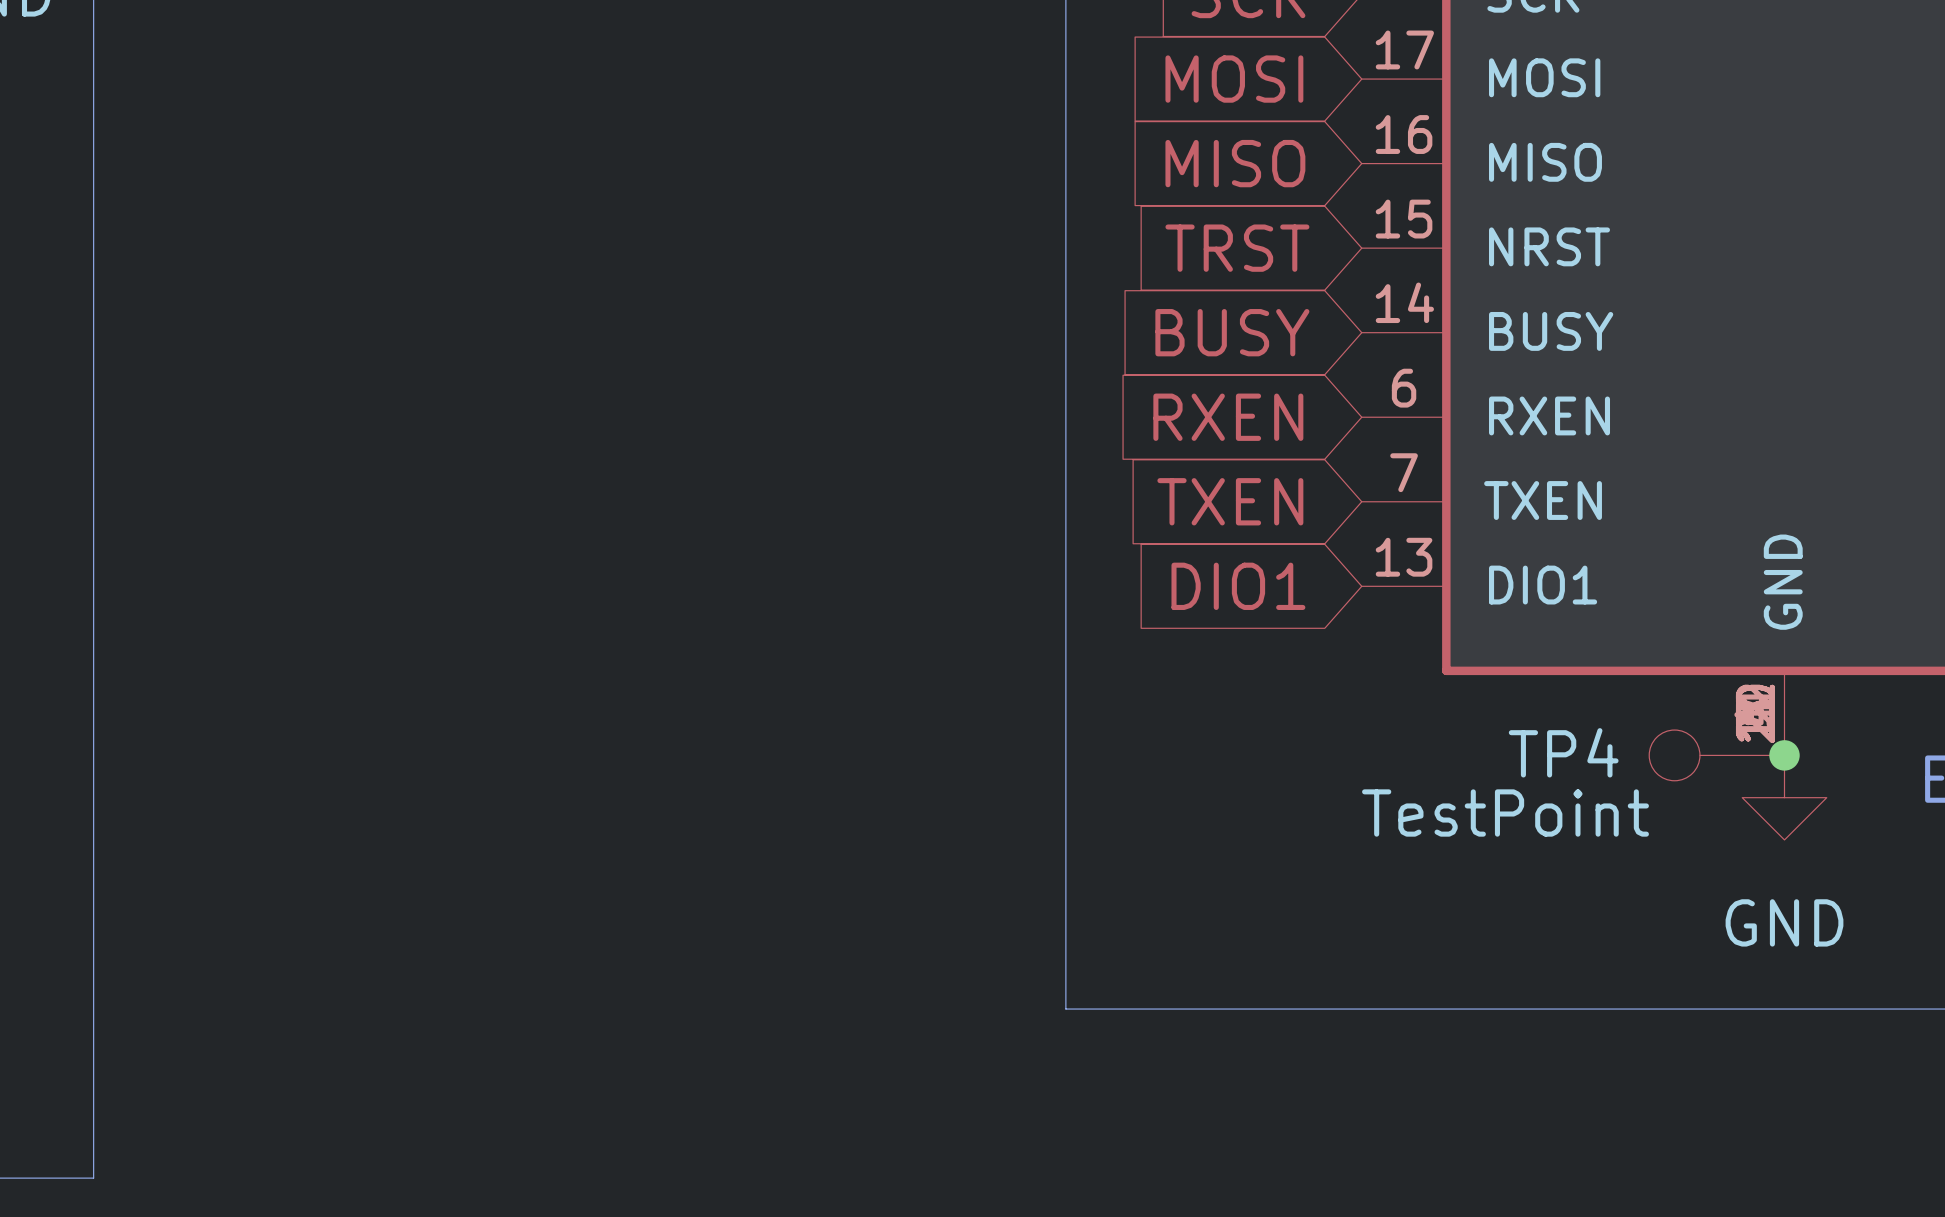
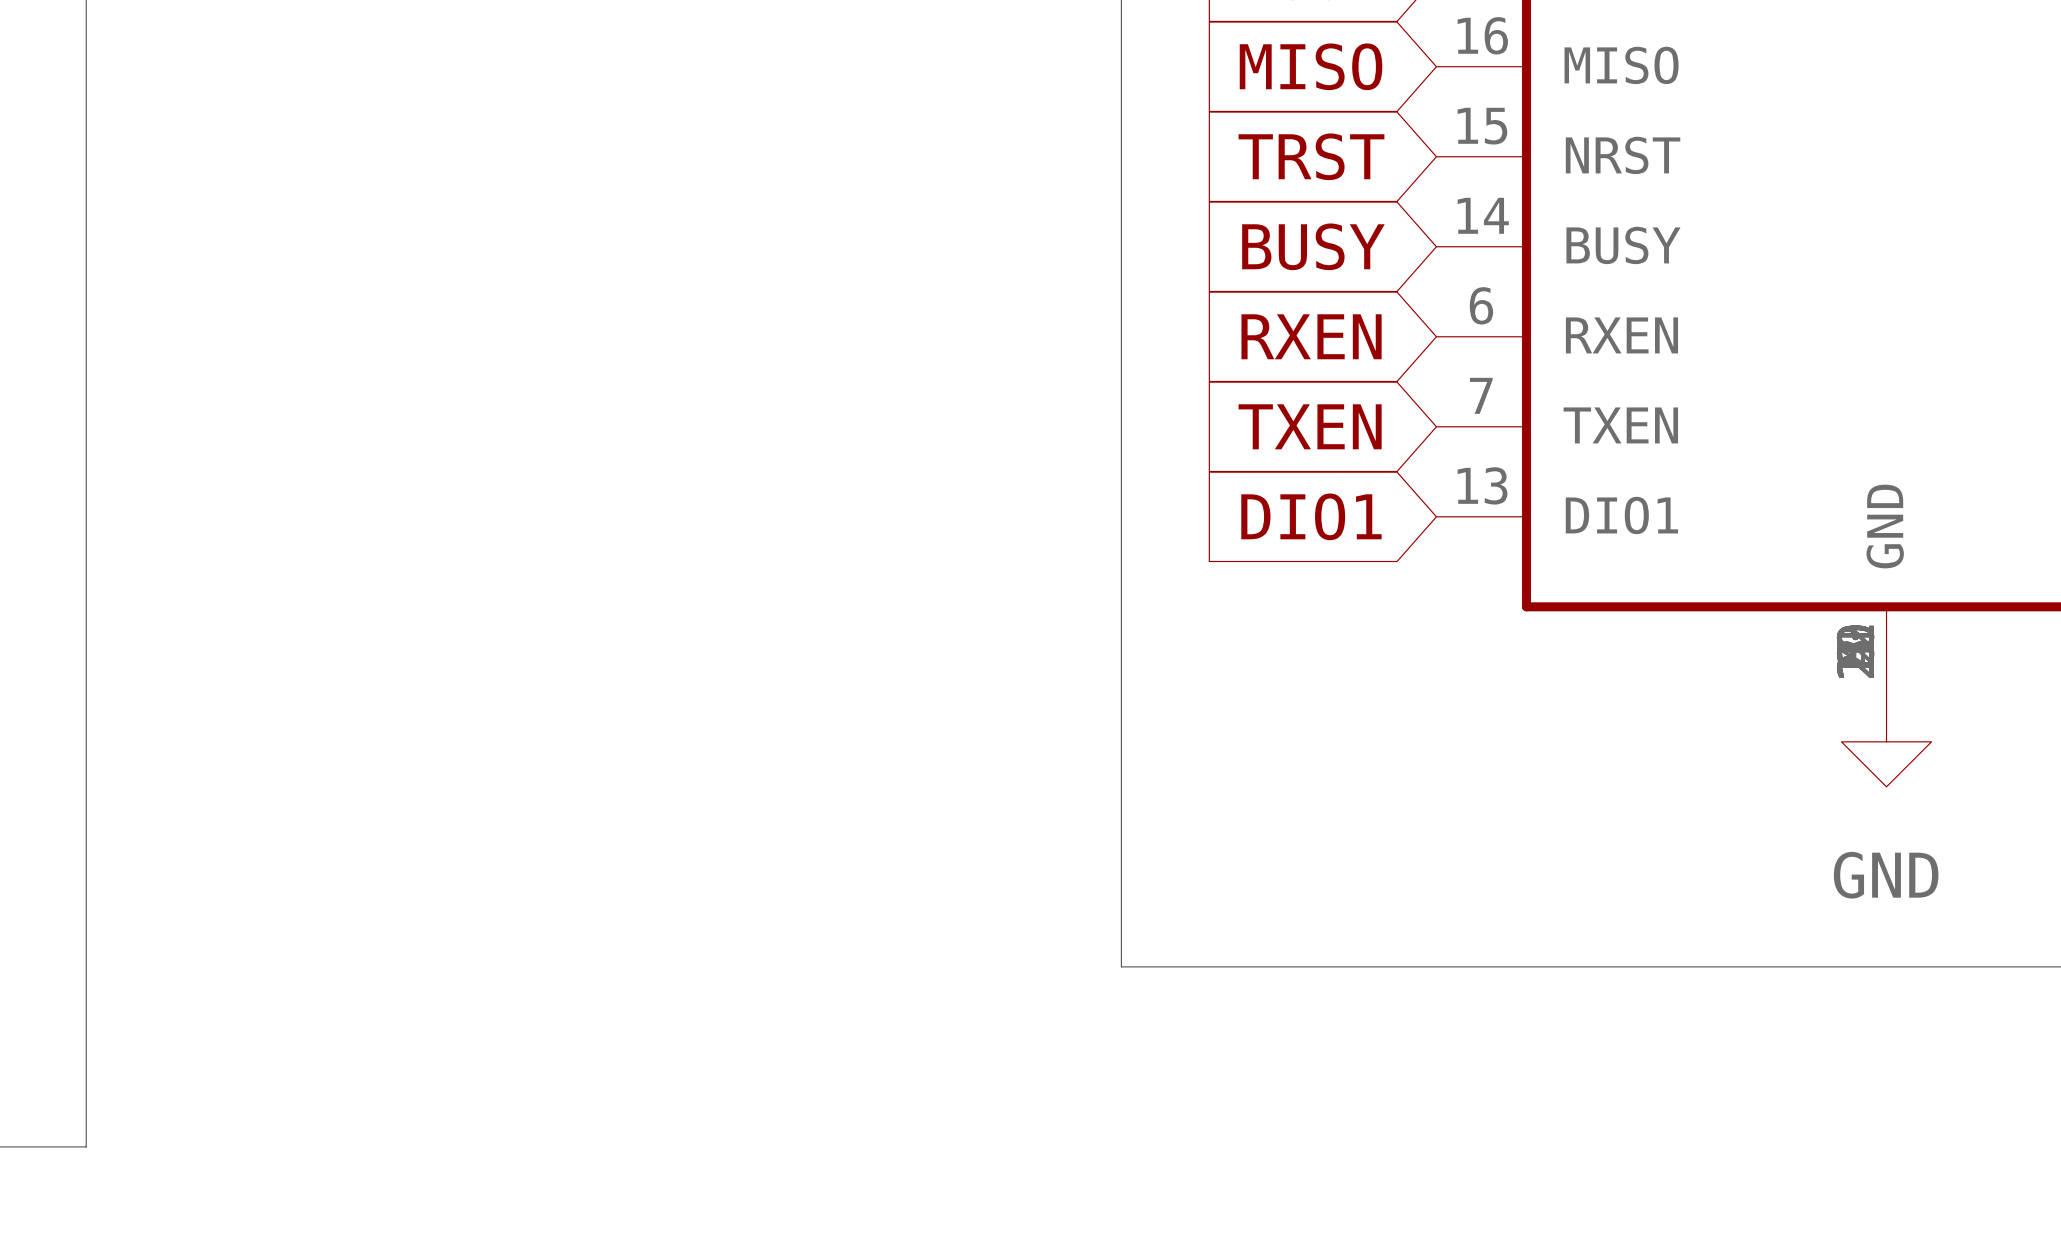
TP4: TestPoint (1716, 755) -> none
junction: (1784, 755) -> none

